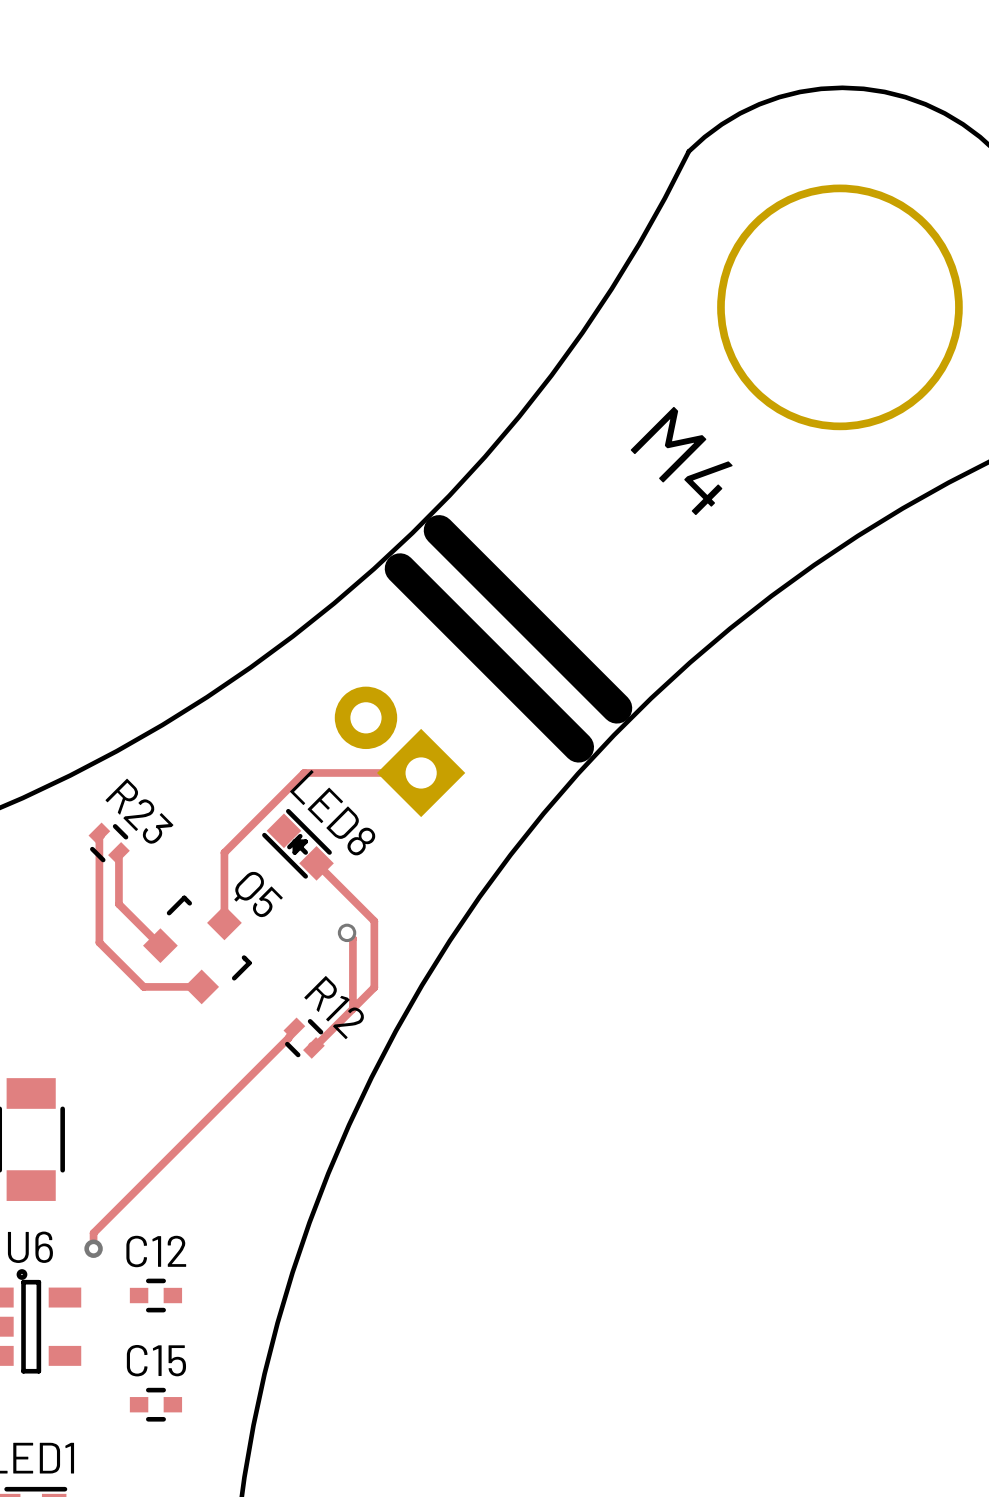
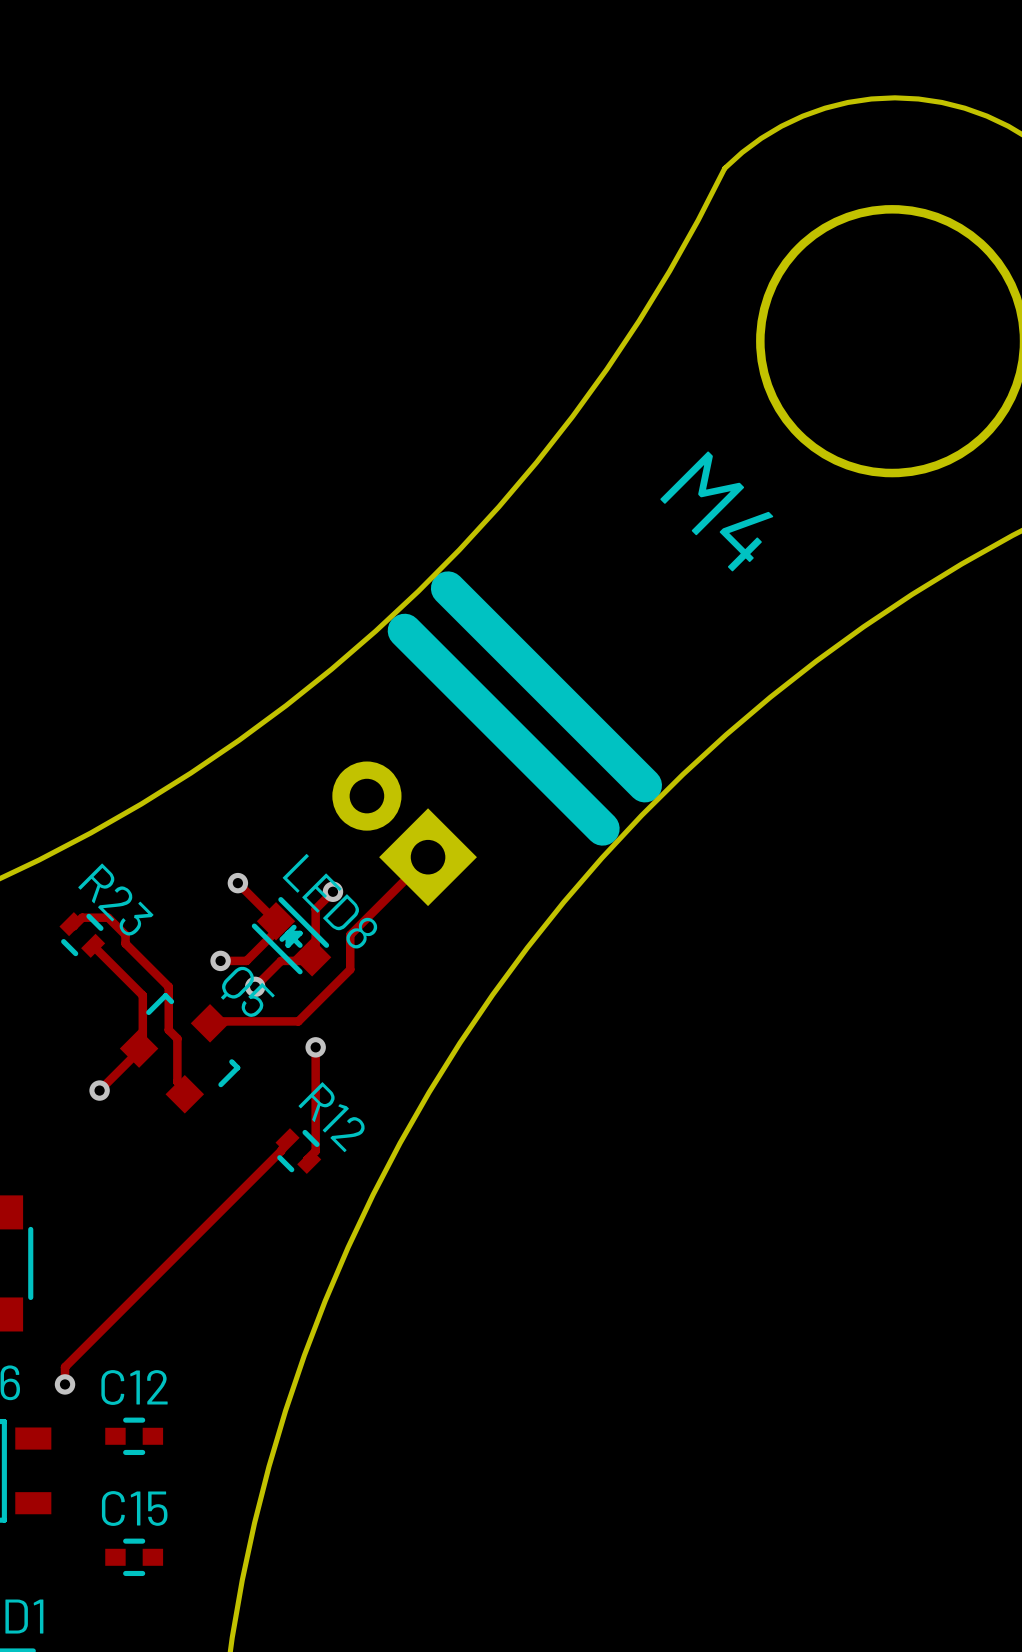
track: (421, 772) (304, 772) (224, 852) (224, 922) -> (428, 857) (350, 934) (350, 969) (298, 1021) (211, 1021)
track: none -> (237, 883) (281, 926)
via: none -> (237, 883)
track: none -> (332, 891) (315, 909) (315, 960) (281, 960) (255, 986)
via: none -> (332, 891)
track: (99, 833) (99, 942) (143, 986) (201, 986) -> none
track: none -> (73, 926) (82, 917) (108, 917) (125, 934) (125, 943) (168, 986) (168, 1030) (177, 1038) (177, 1081) (186, 1090)
track: none -> (281, 926) (246, 960) (220, 960)
track: (118, 852) (118, 904) (160, 945) -> (93, 945) (142, 995) (142, 1047) (99, 1090)
track: (316, 863) (374, 921) (374, 987) (313, 1047) -> none
via: none -> (220, 960)
via: none -> (255, 986)
track: (347, 932) (352, 938) (352, 1008) -> none
via: (347, 932) -> none
track: none -> (315, 1047) (315, 1151) (307, 1159)
via: none -> (315, 1047)
via: none -> (99, 1090)

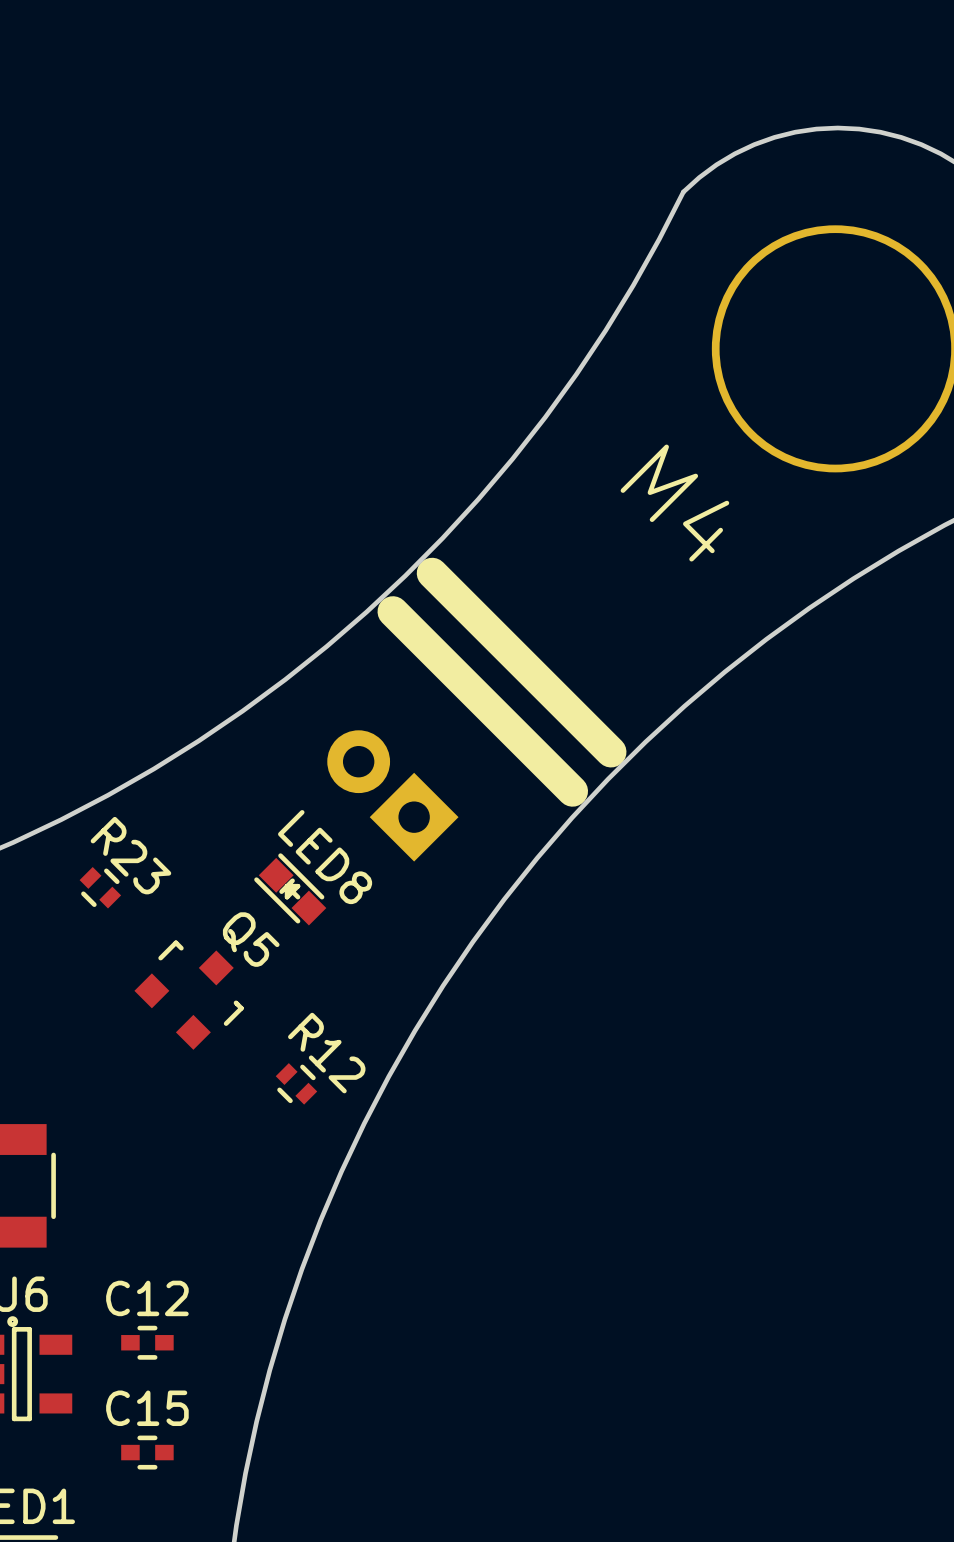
track: (428, 857) (350, 934) (350, 969) (298, 1021) (211, 1021) (210, 1023) -> none
track: (237, 883) (281, 926) -> none
via: (237, 883) -> none
track: (332, 891) (315, 909) (315, 960) (281, 960) (255, 986) -> none
via: (332, 891) -> none
track: (71, 924) (73, 926) (82, 917) (108, 917) (125, 934) (125, 943) (168, 986) (168, 1030) (177, 1038) (177, 1081) (186, 1090) (184, 1094) -> none
track: (281, 926) (246, 960) (220, 960) -> none
track: (93, 945) (142, 995) (142, 1047) -> none
via: (220, 960) -> none
via: (255, 986) -> none
track: (142, 1047) (99, 1090) -> none
track: (315, 1047) (315, 1151) (307, 1159) (309, 1161) -> none
via: (315, 1047) -> none
via: (99, 1090) -> none
track: (287, 1140) (281, 1151) (65, 1367) (65, 1384) -> none
via: (65, 1384) -> none

